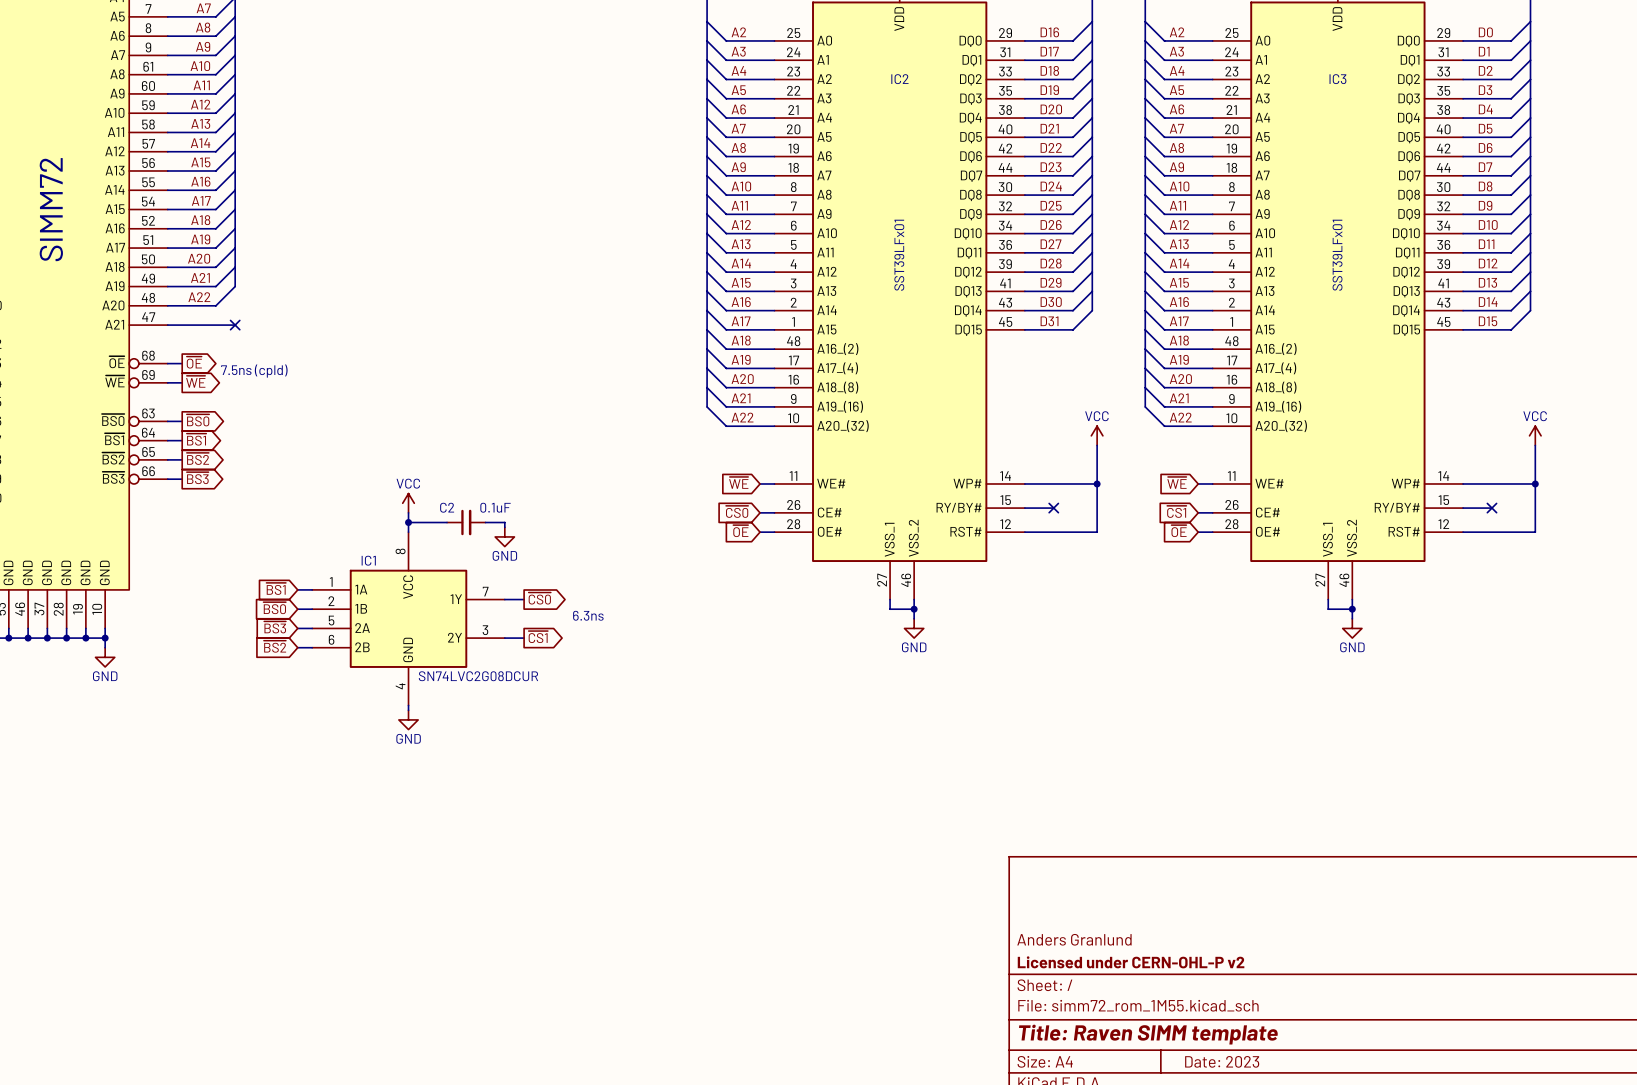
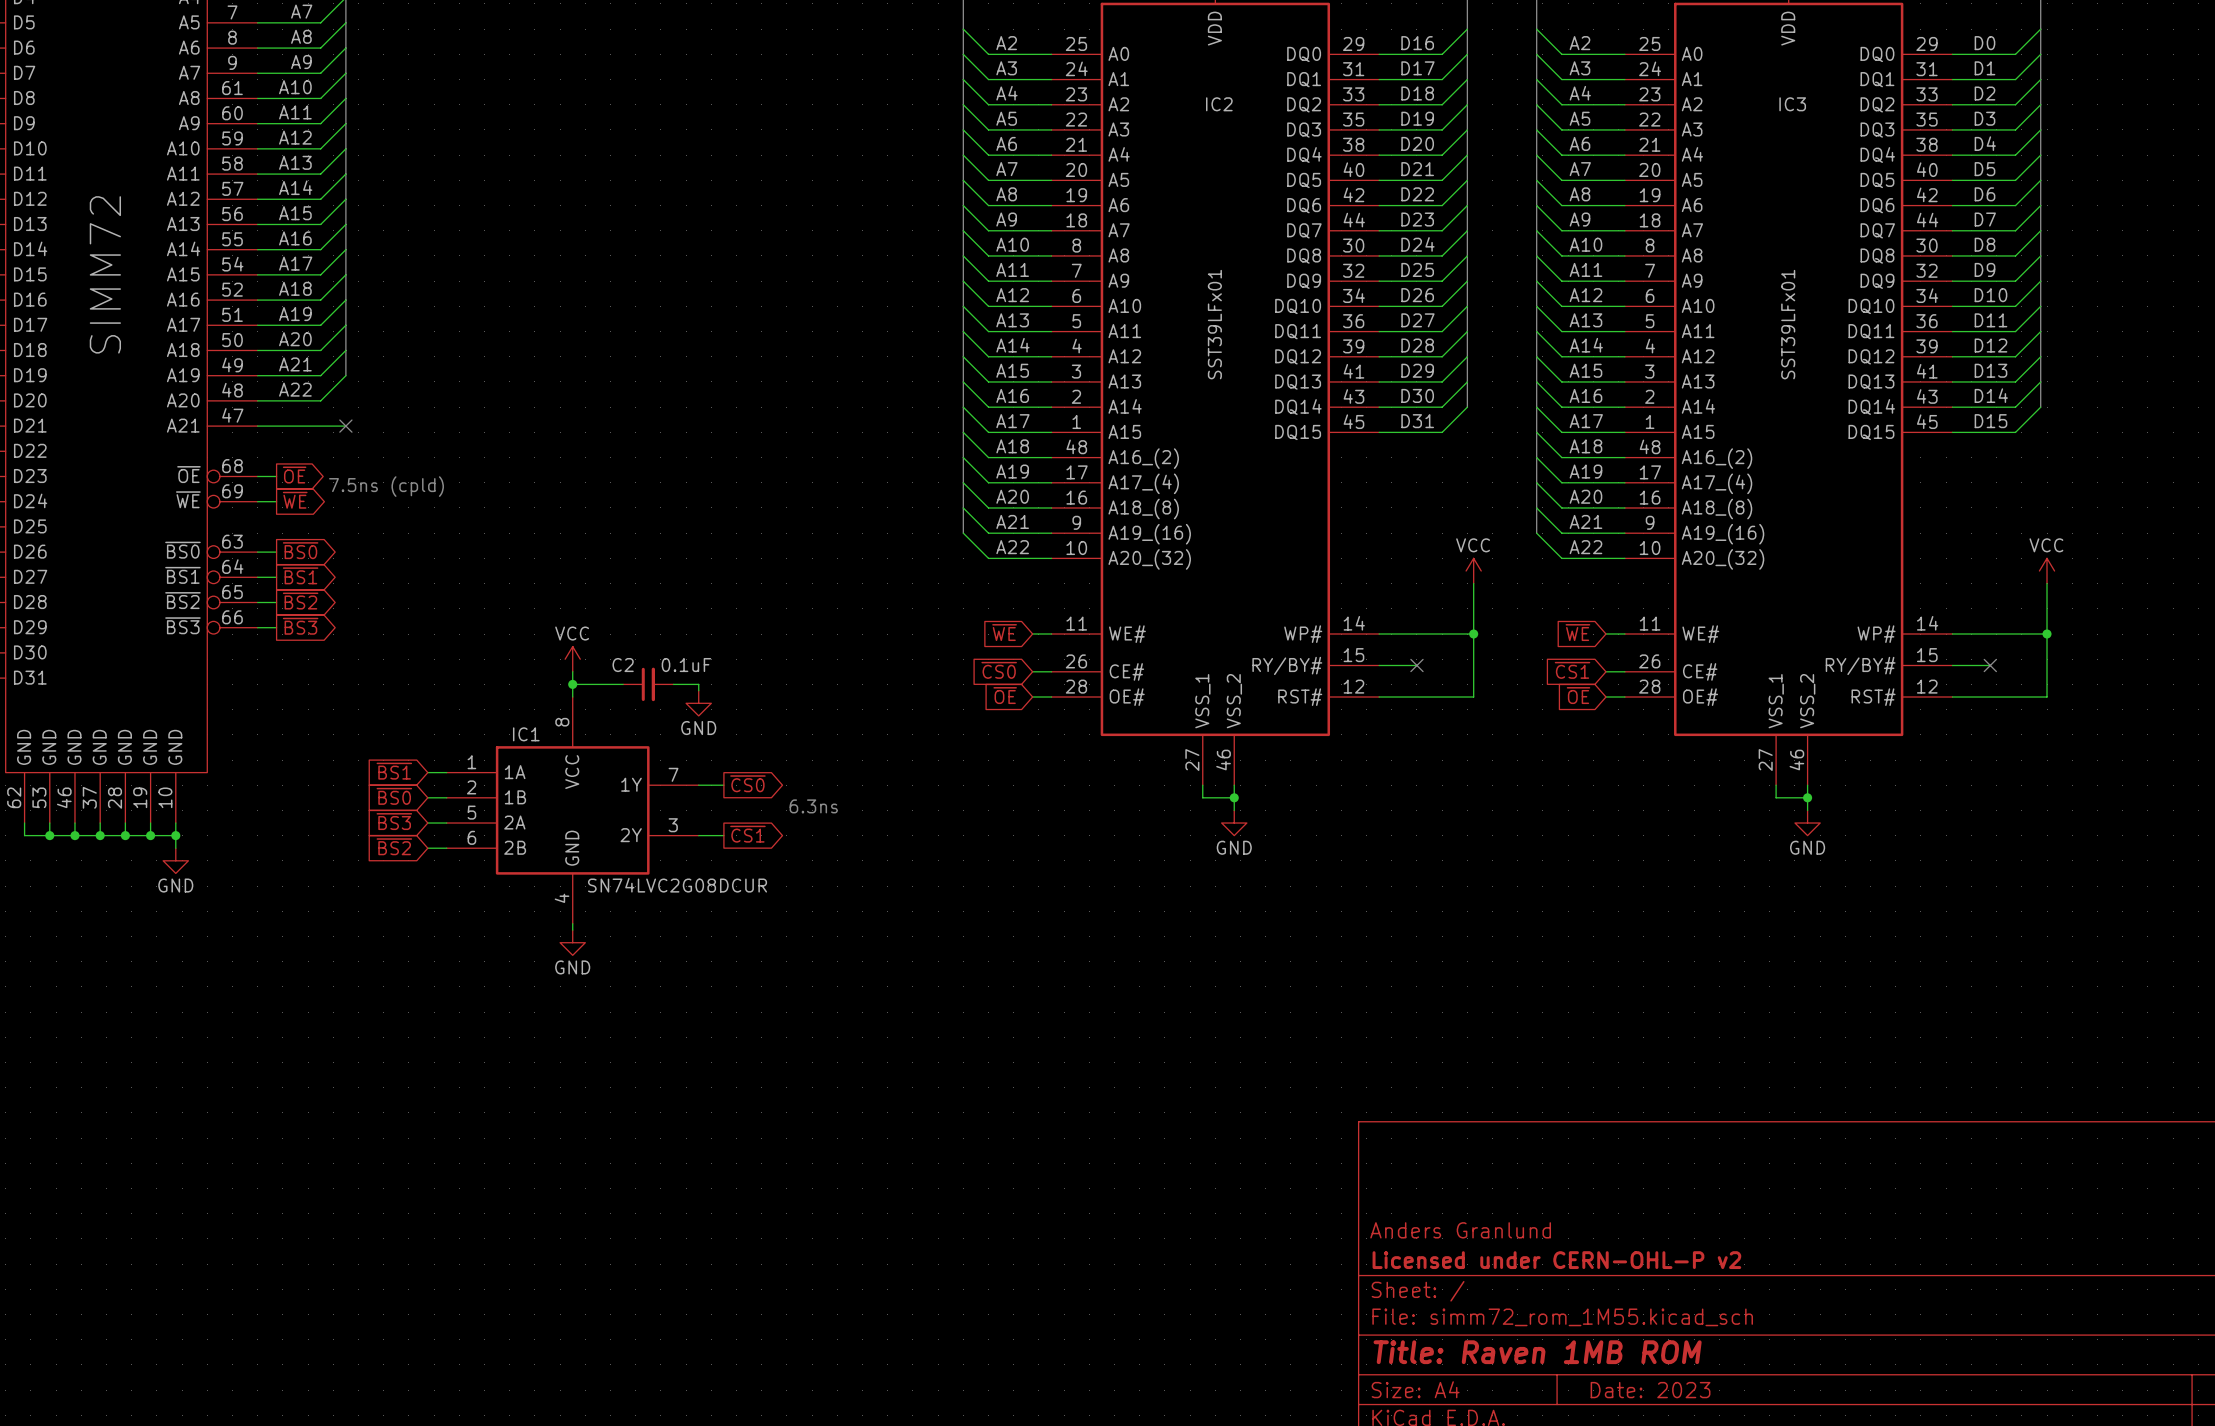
title block: Title: Raven SIMM template (1148, 1034) -> Title: Raven 1MB ROM (1537, 1352)

